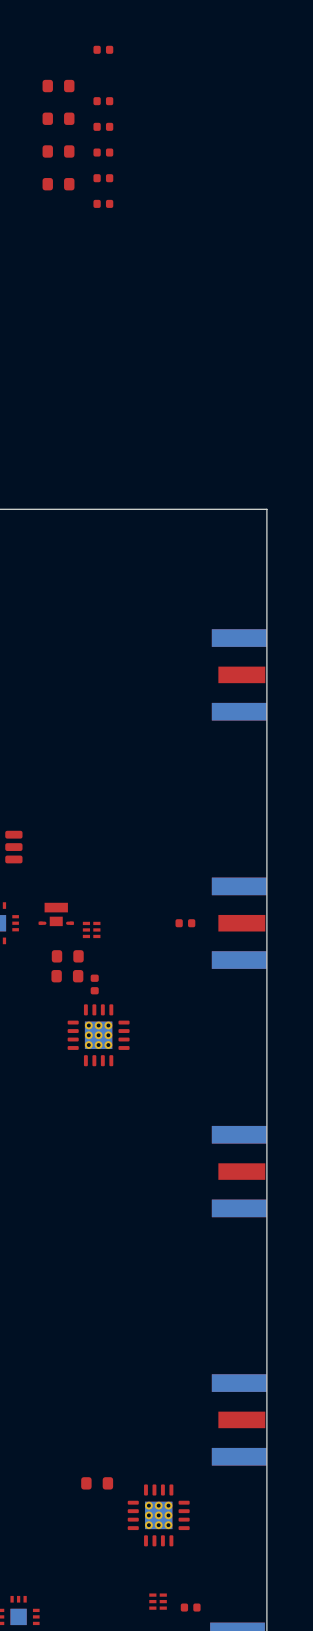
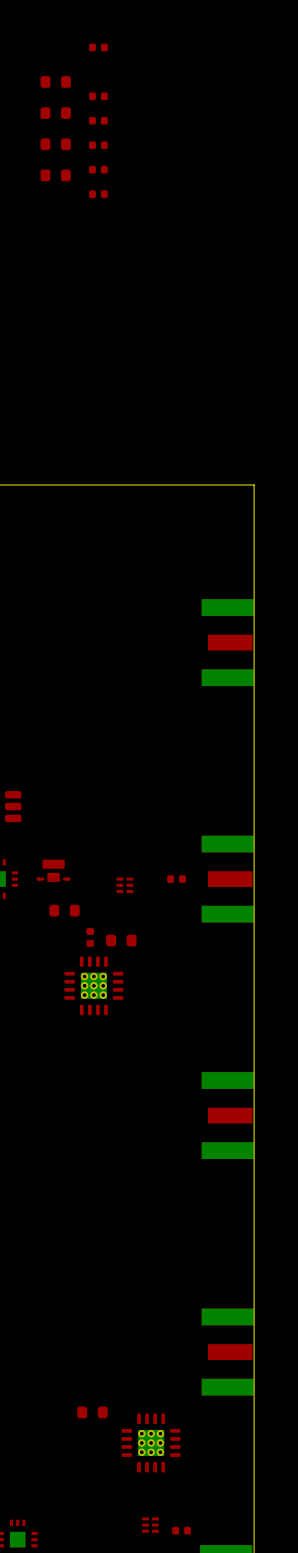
part position: (91, 929) -> (124, 885)
part position: (67, 976) -> (121, 940)

